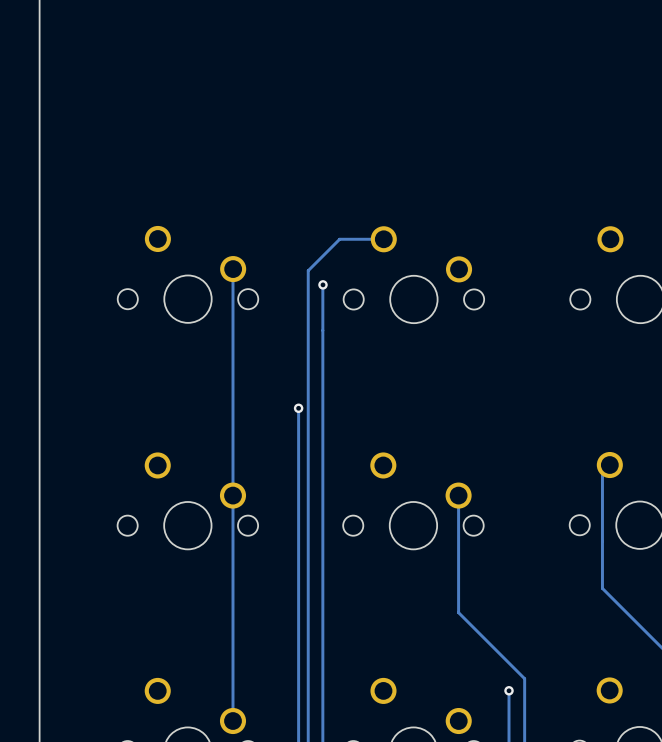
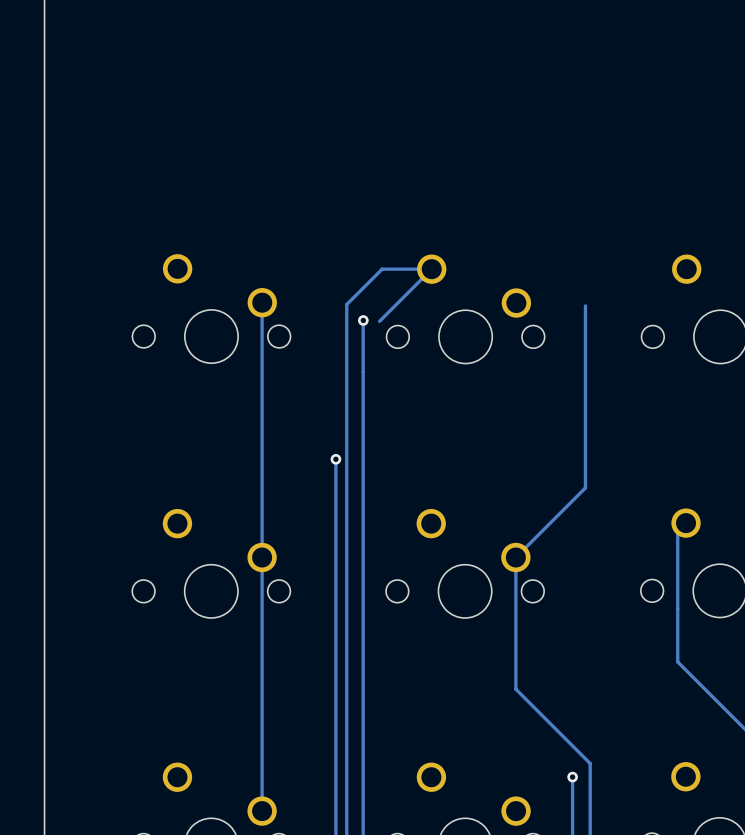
track: none -> (431, 269) (379, 321)
track: none -> (585, 305) (585, 487) (515, 557)

